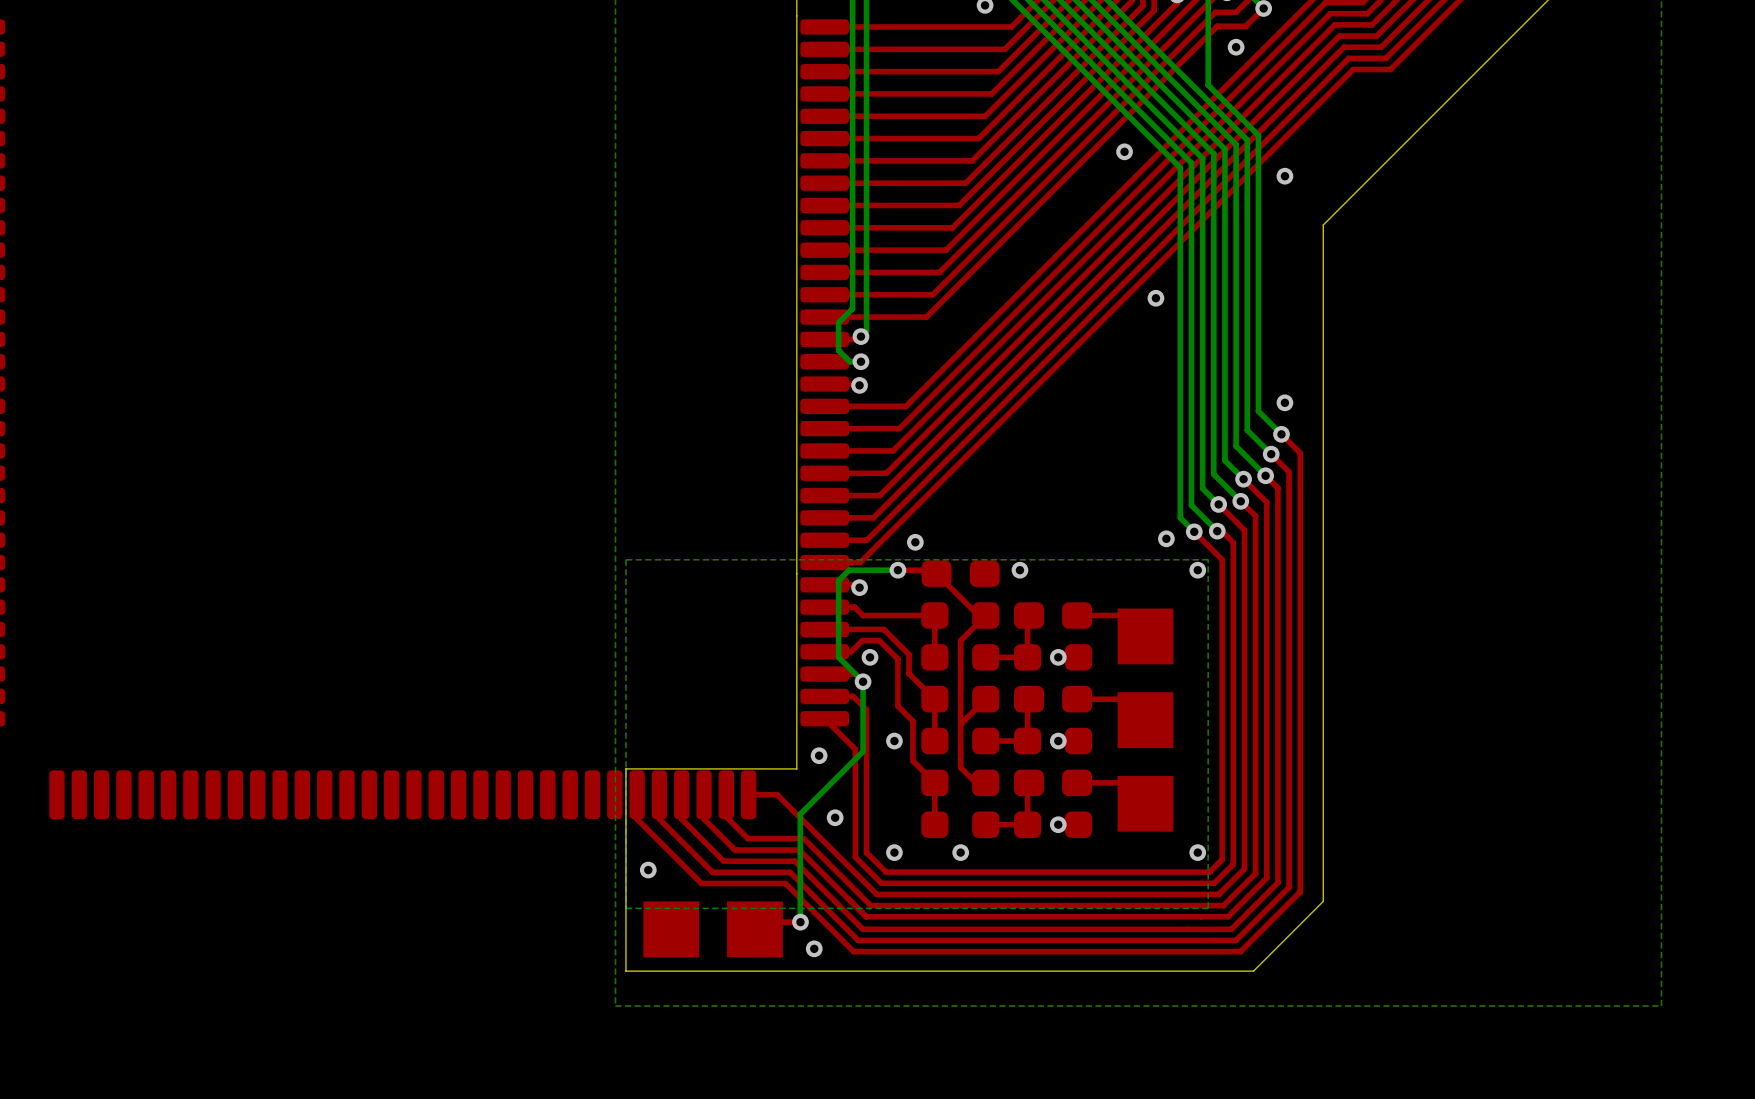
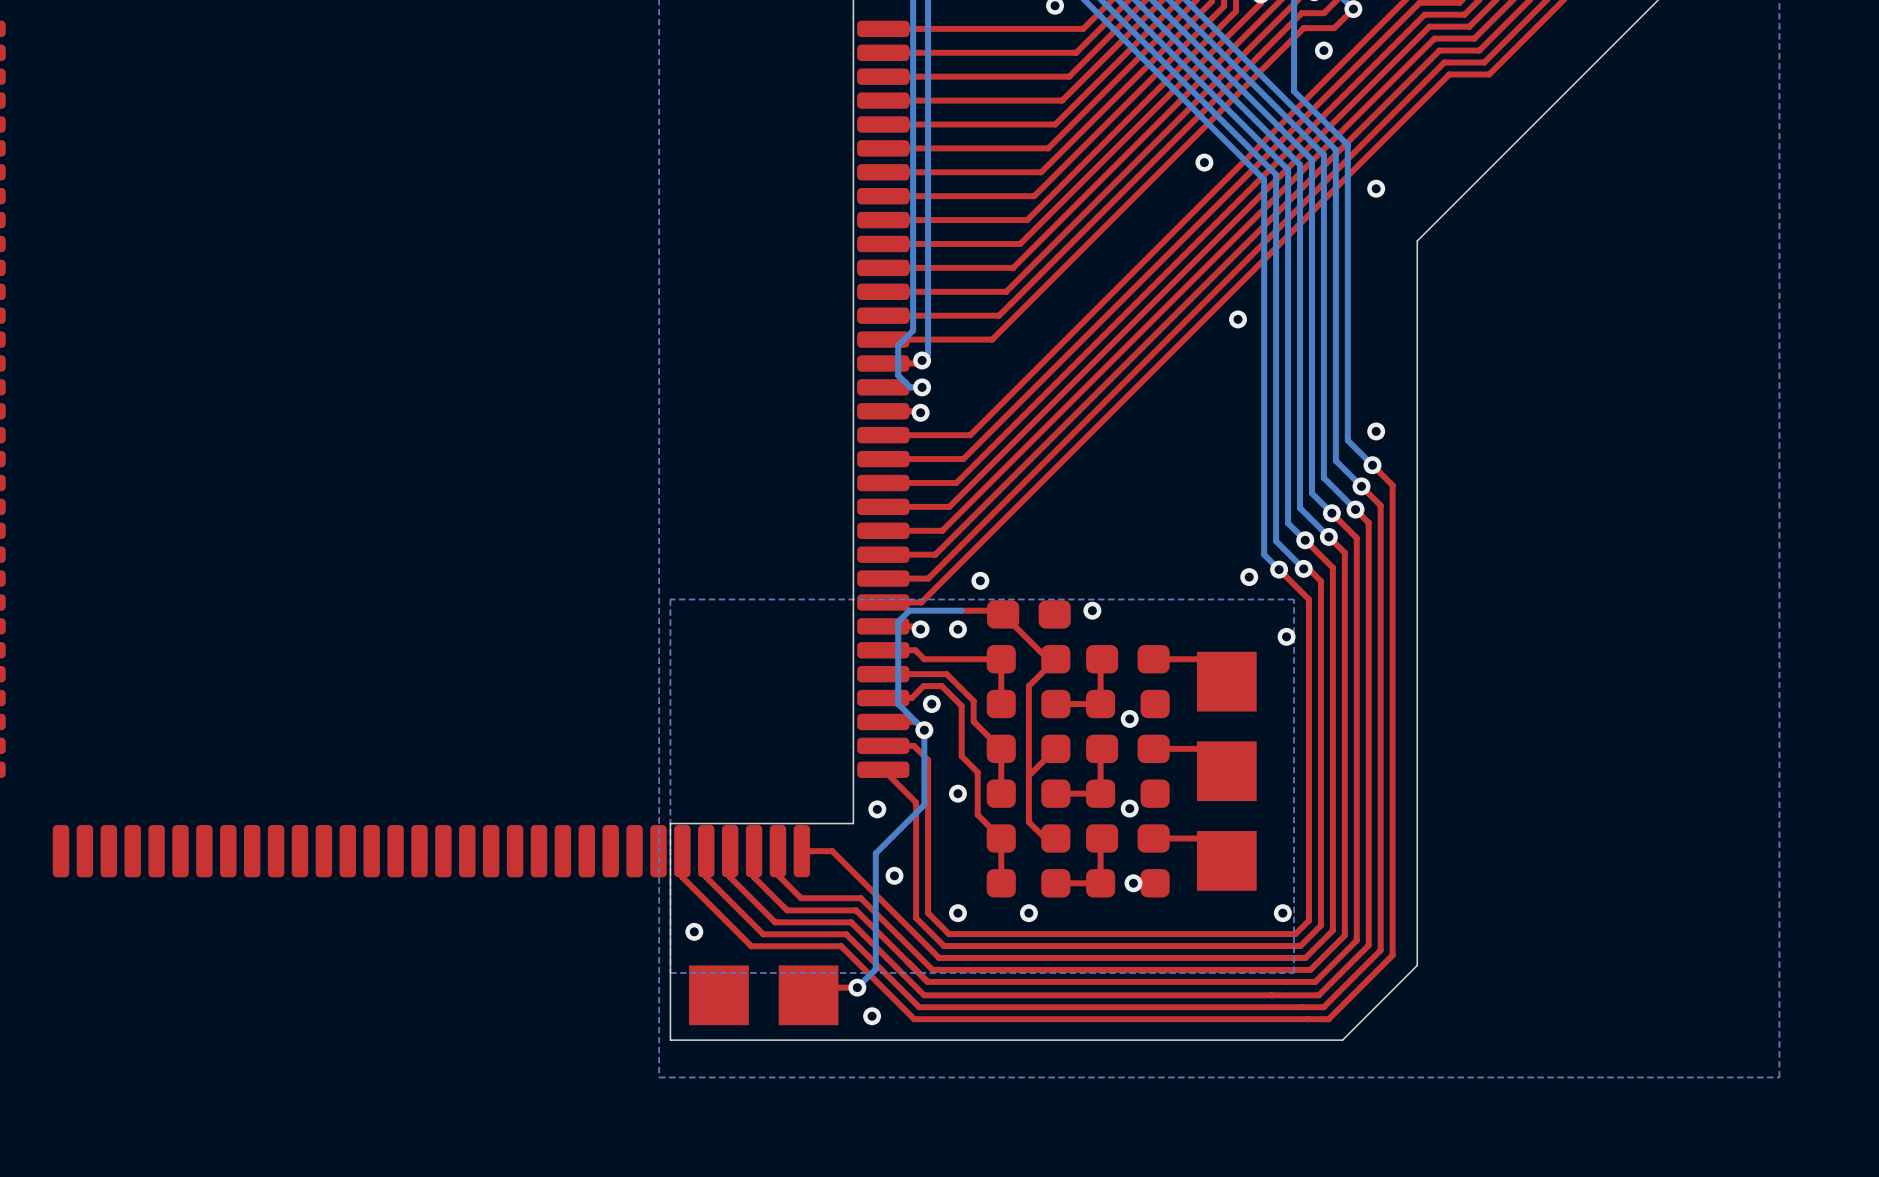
via position: (897, 570) -> (957, 629)
via position: (1197, 570) -> (1286, 636)
via position: (1058, 657) -> (1129, 718)
via position: (1058, 741) -> (1129, 808)
bottom track: (817, 796) (800, 814) (800, 921) -> (875, 853) (875, 969) (857, 987)

